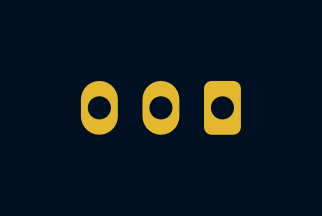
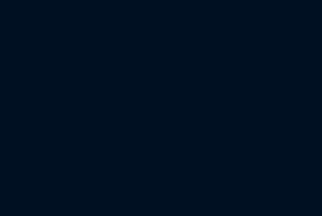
part: (160, 107) -> none

